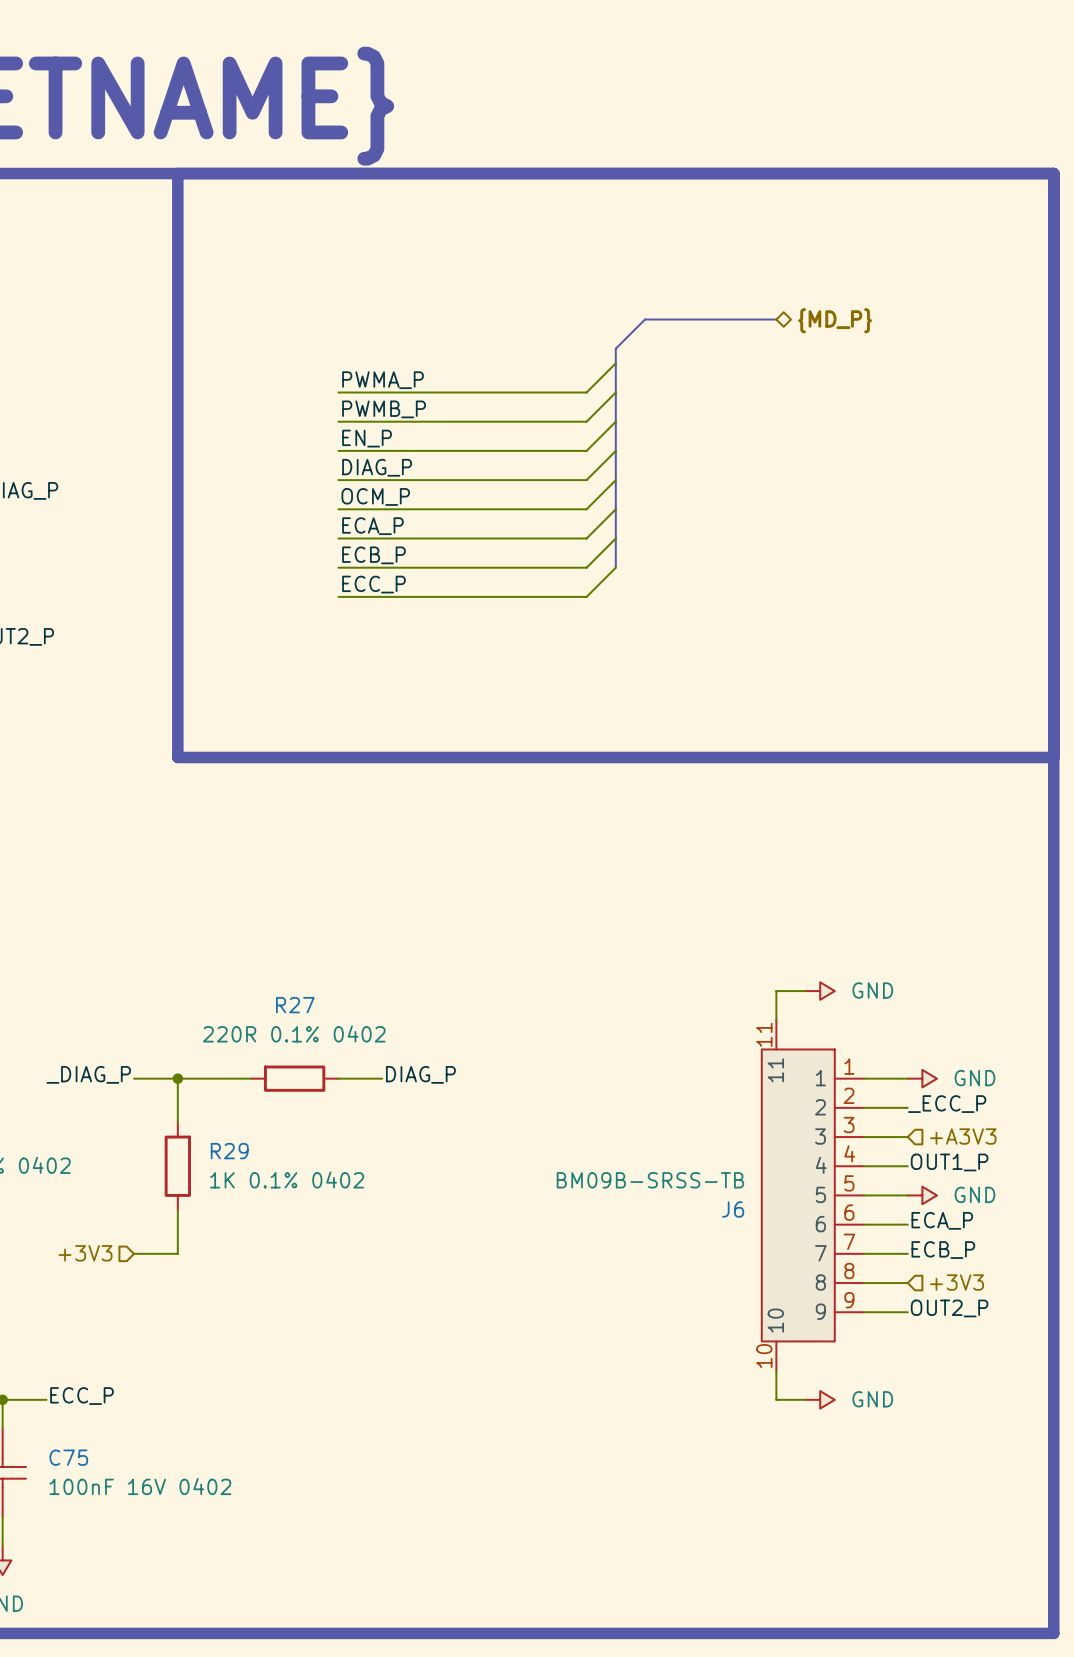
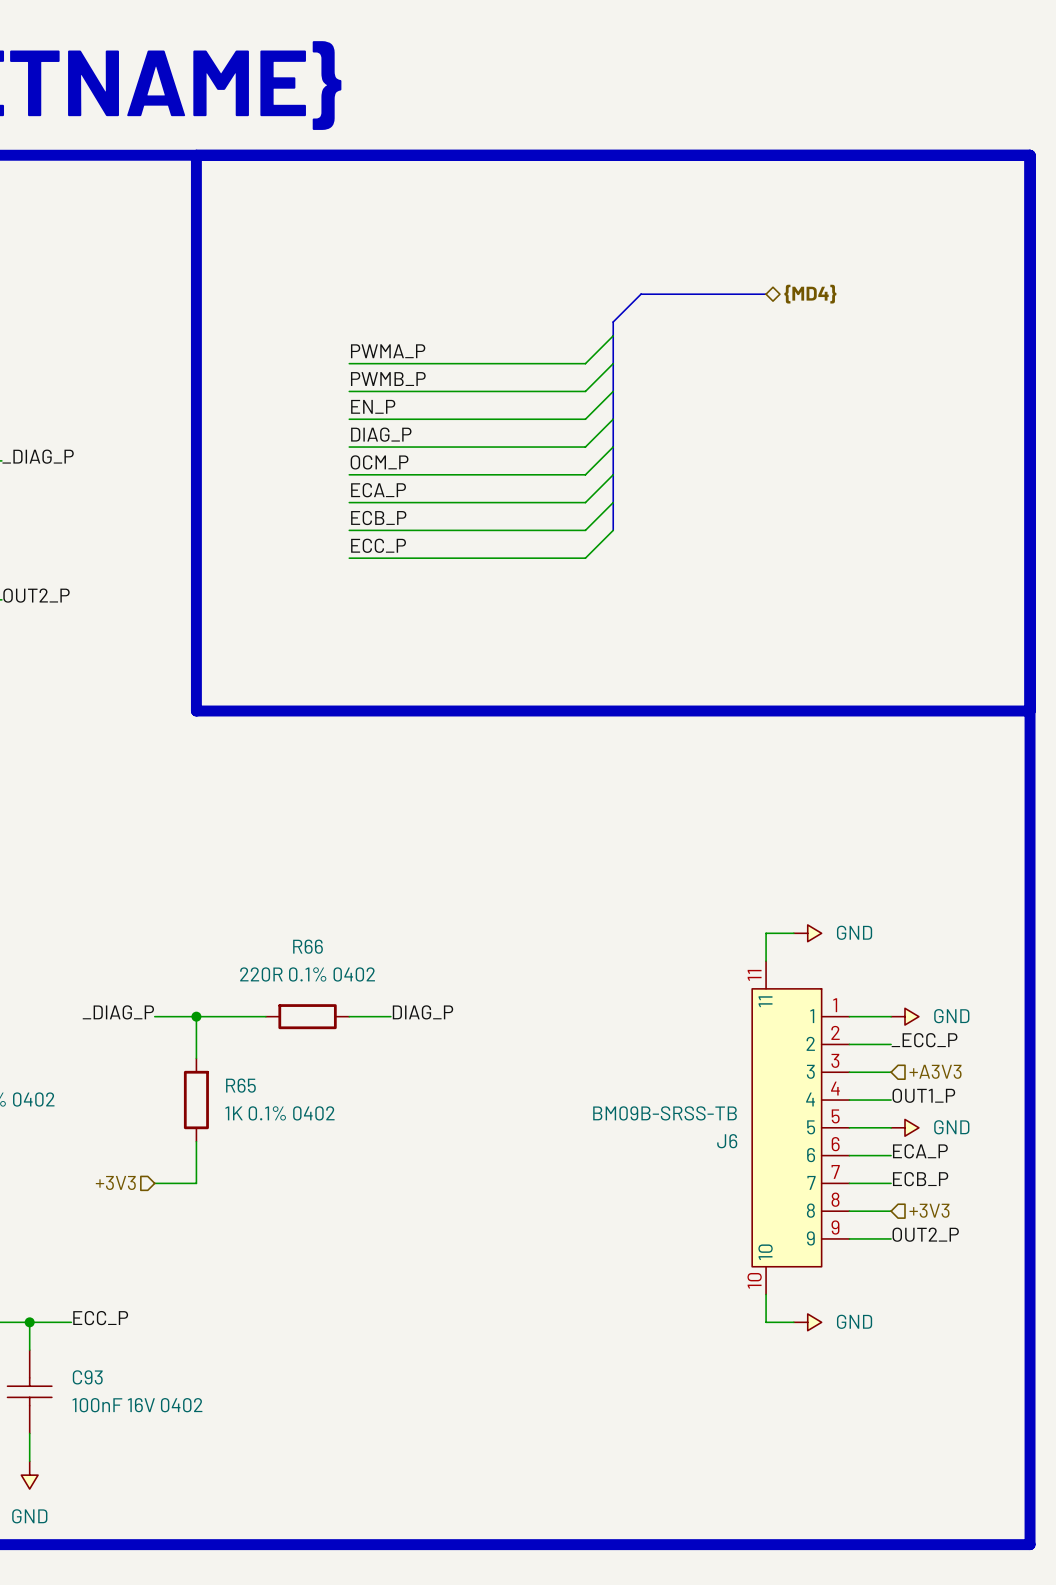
hierarchical label: {MD_P} (835, 320) -> {MD4} (810, 294)
R27 name: R27 (295, 1005) -> R66 (308, 946)
R29 name: R29 (229, 1151) -> R65 (240, 1085)
C75 name: C75 (68, 1457) -> C93 (87, 1377)

